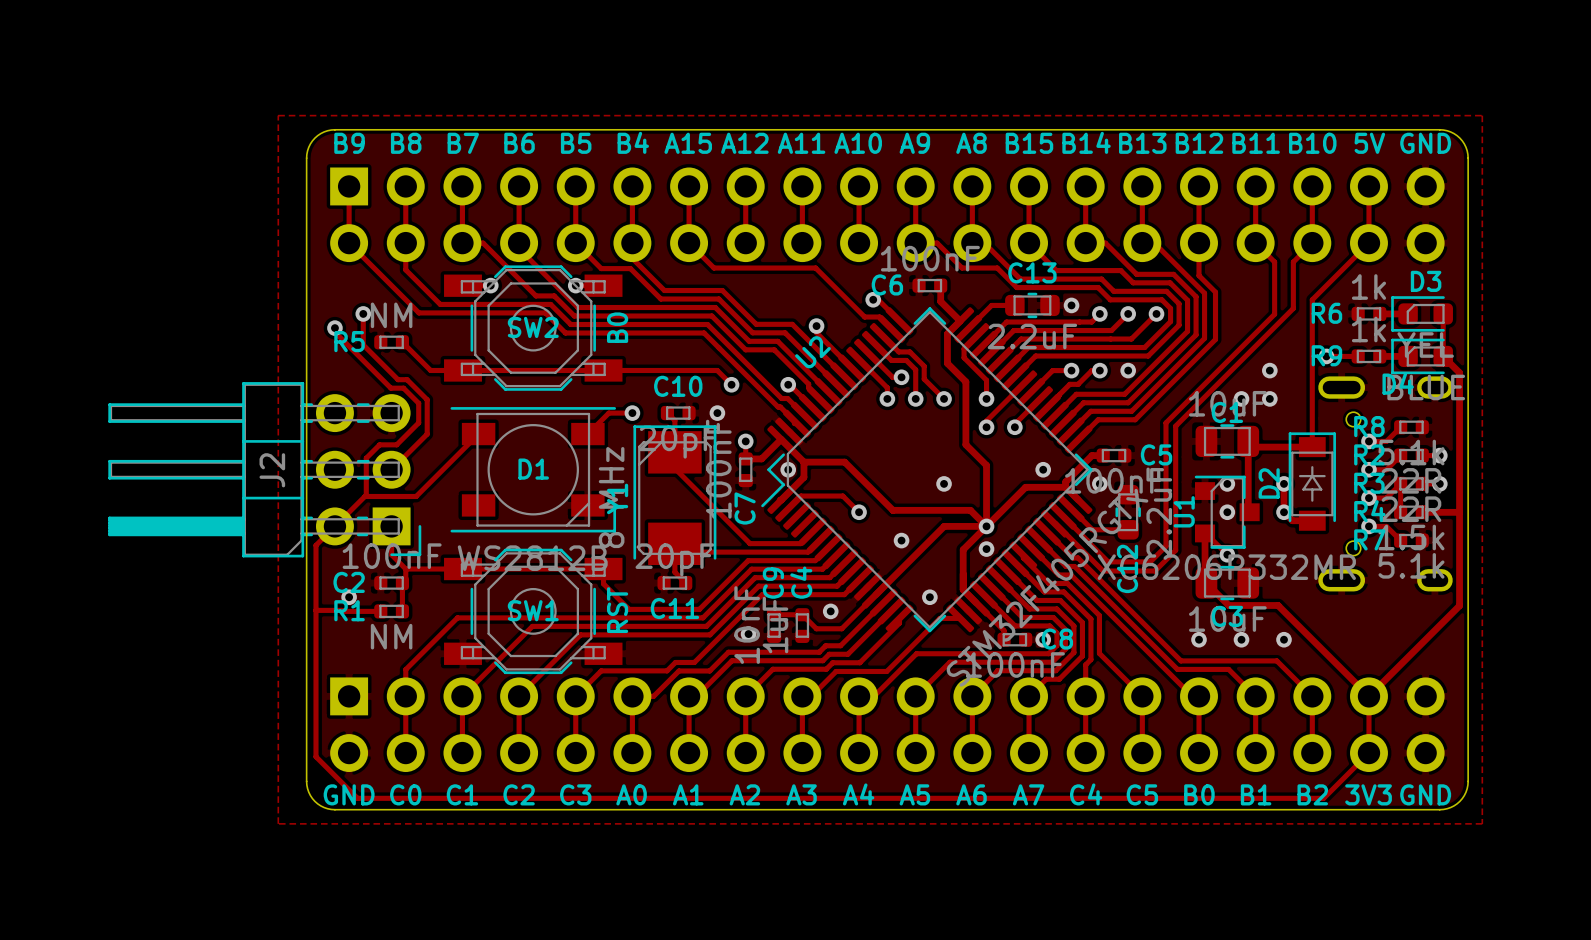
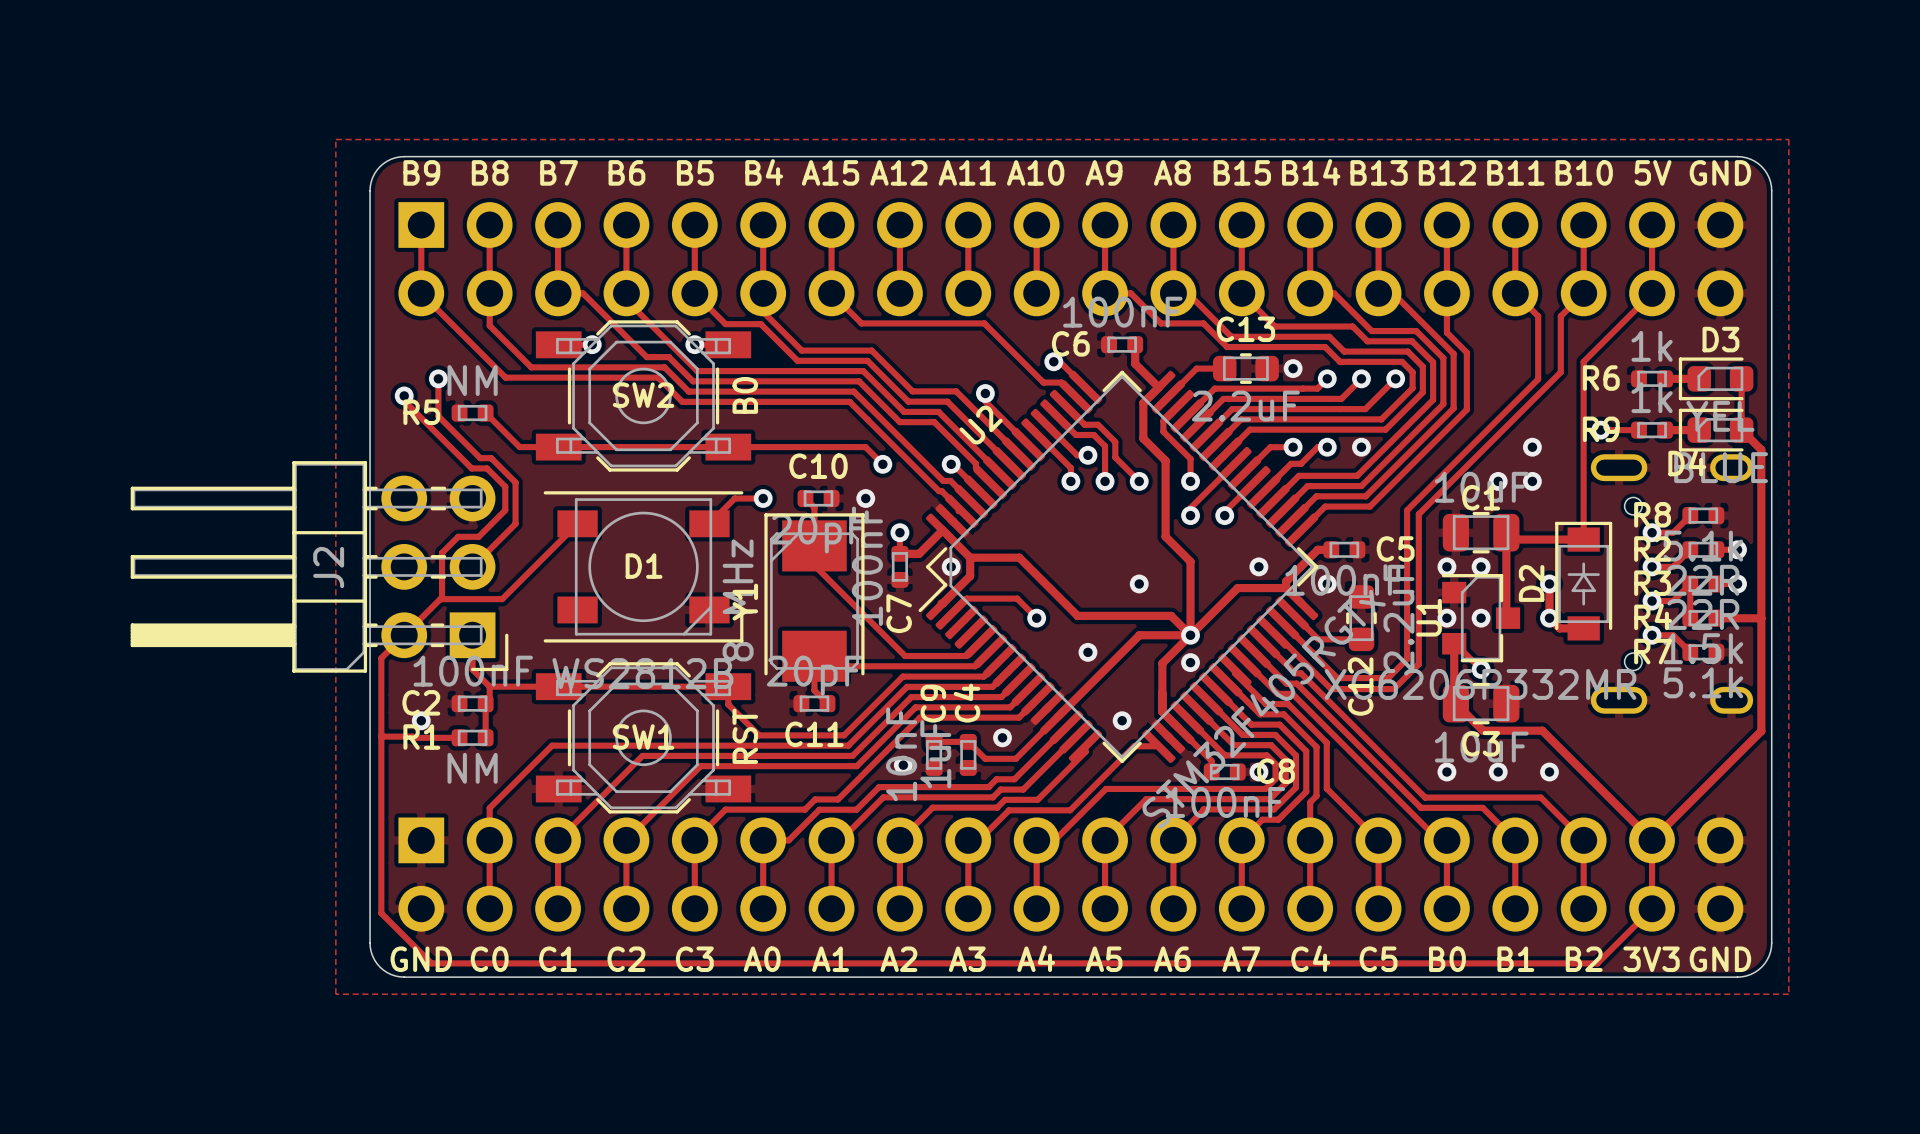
via: none -> (1446, 566)
via position: (1227, 483) -> (1481, 566)
via: none -> (1446, 618)

